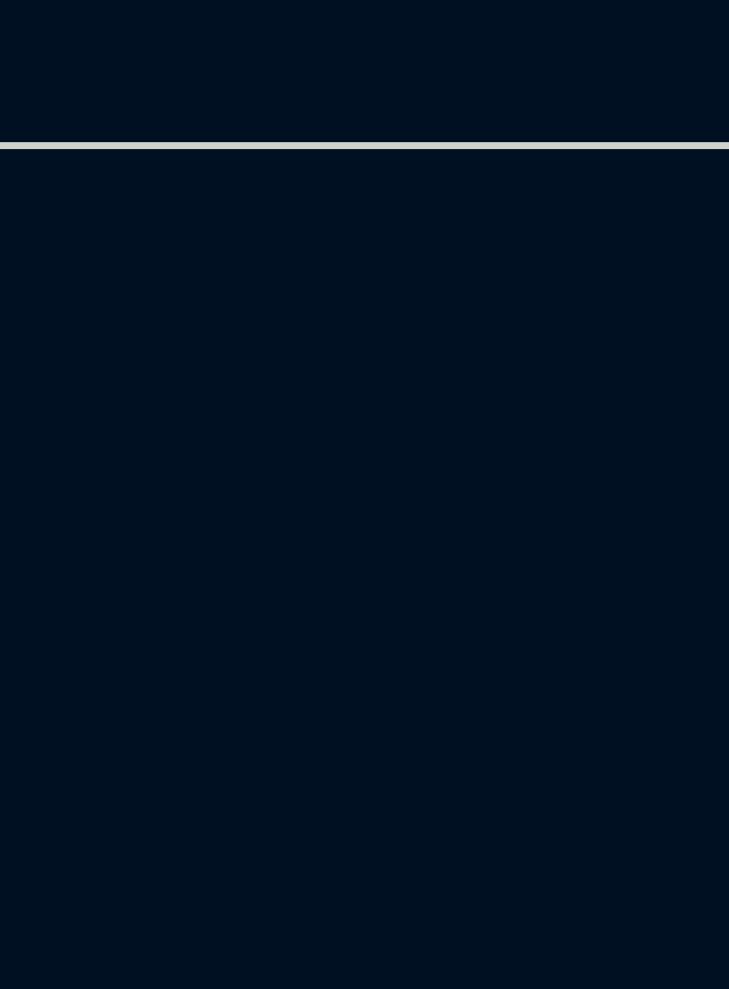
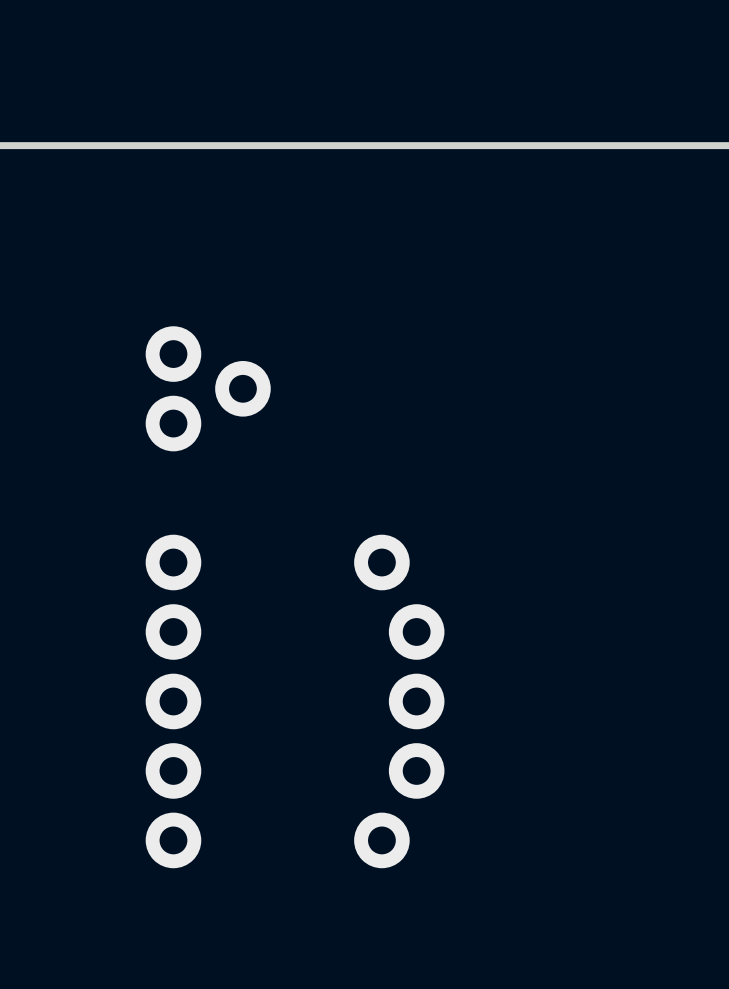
via: none -> (173, 354)
via: none -> (242, 388)
via: none -> (173, 423)
via: none -> (173, 562)
via: none -> (381, 562)
via: none -> (173, 631)
via: none -> (416, 631)
via: none -> (173, 701)
via: none -> (416, 701)
via: none -> (173, 770)
via: none -> (416, 770)
via: none -> (173, 840)
via: none -> (381, 840)

